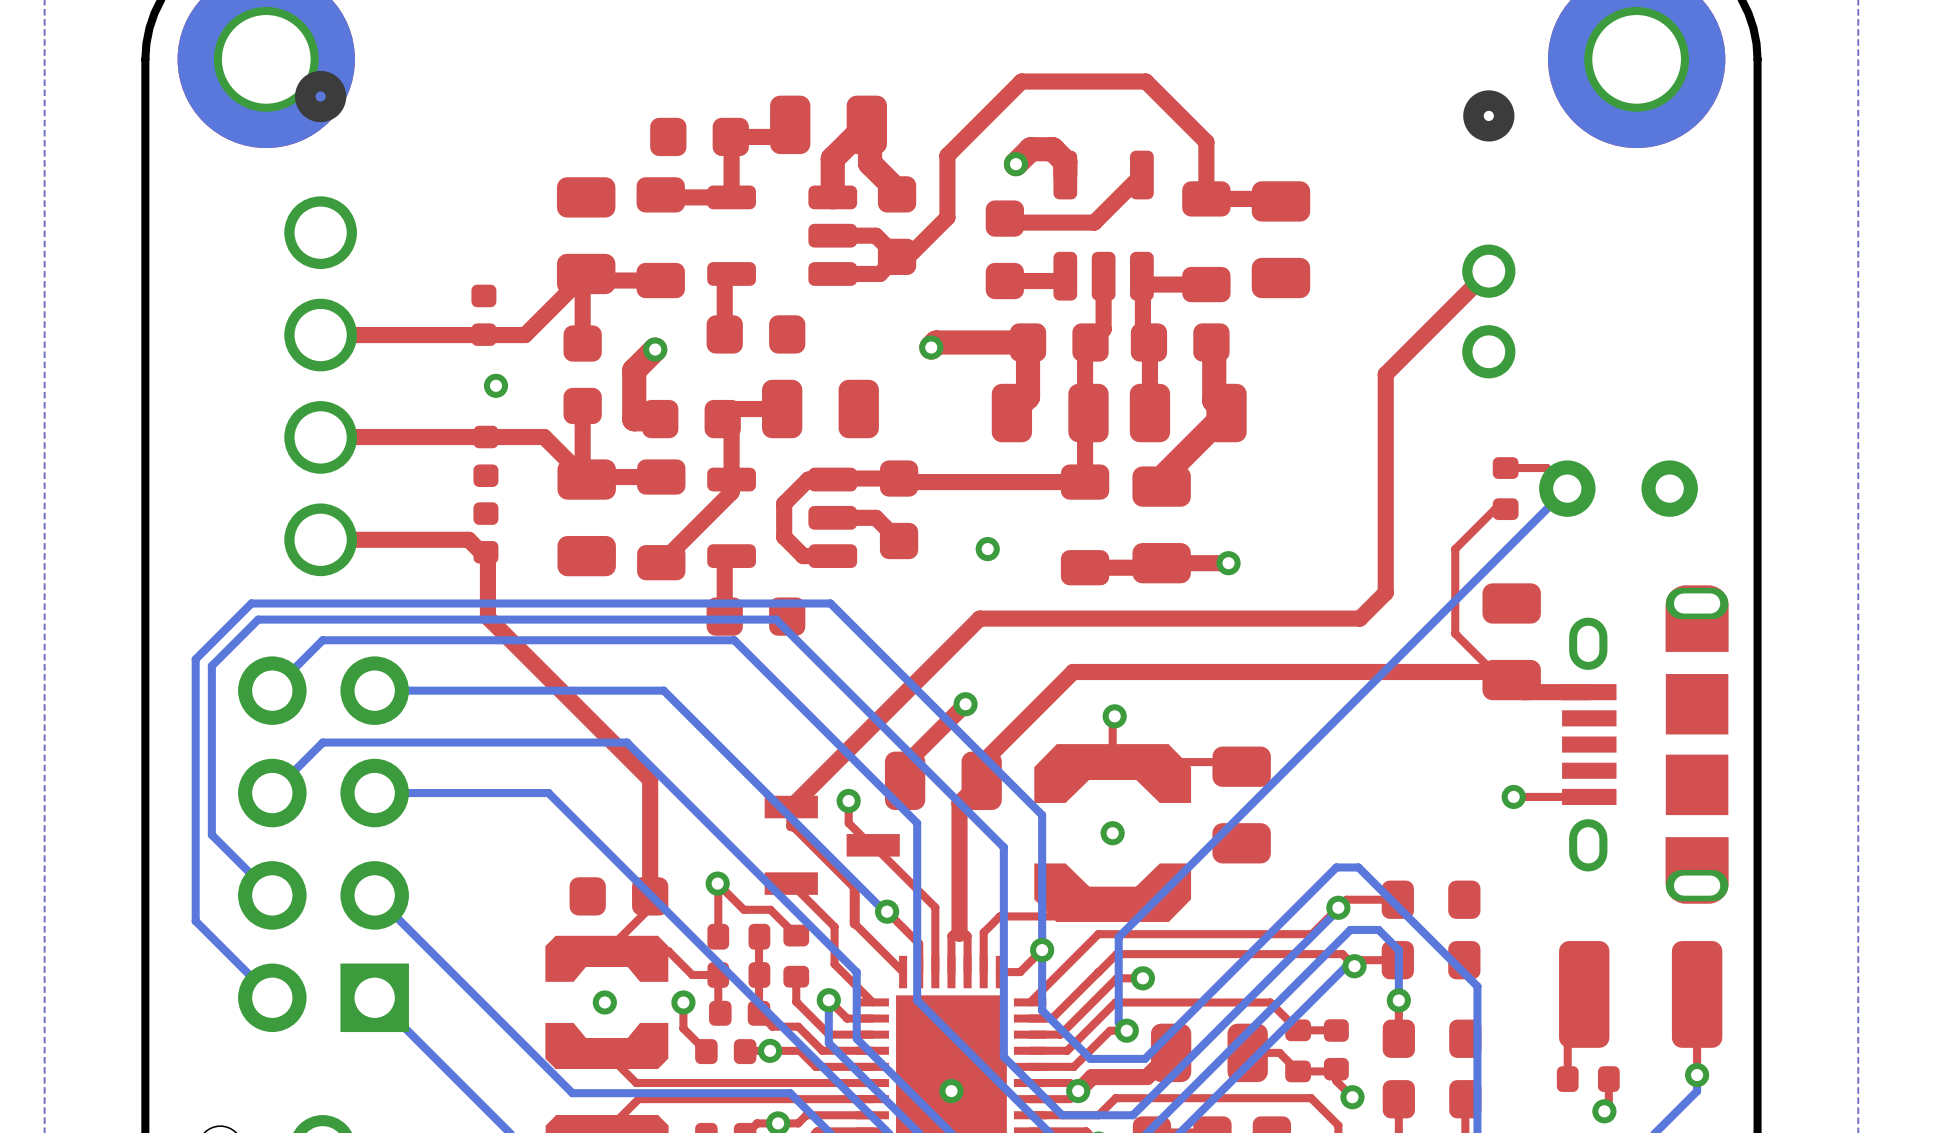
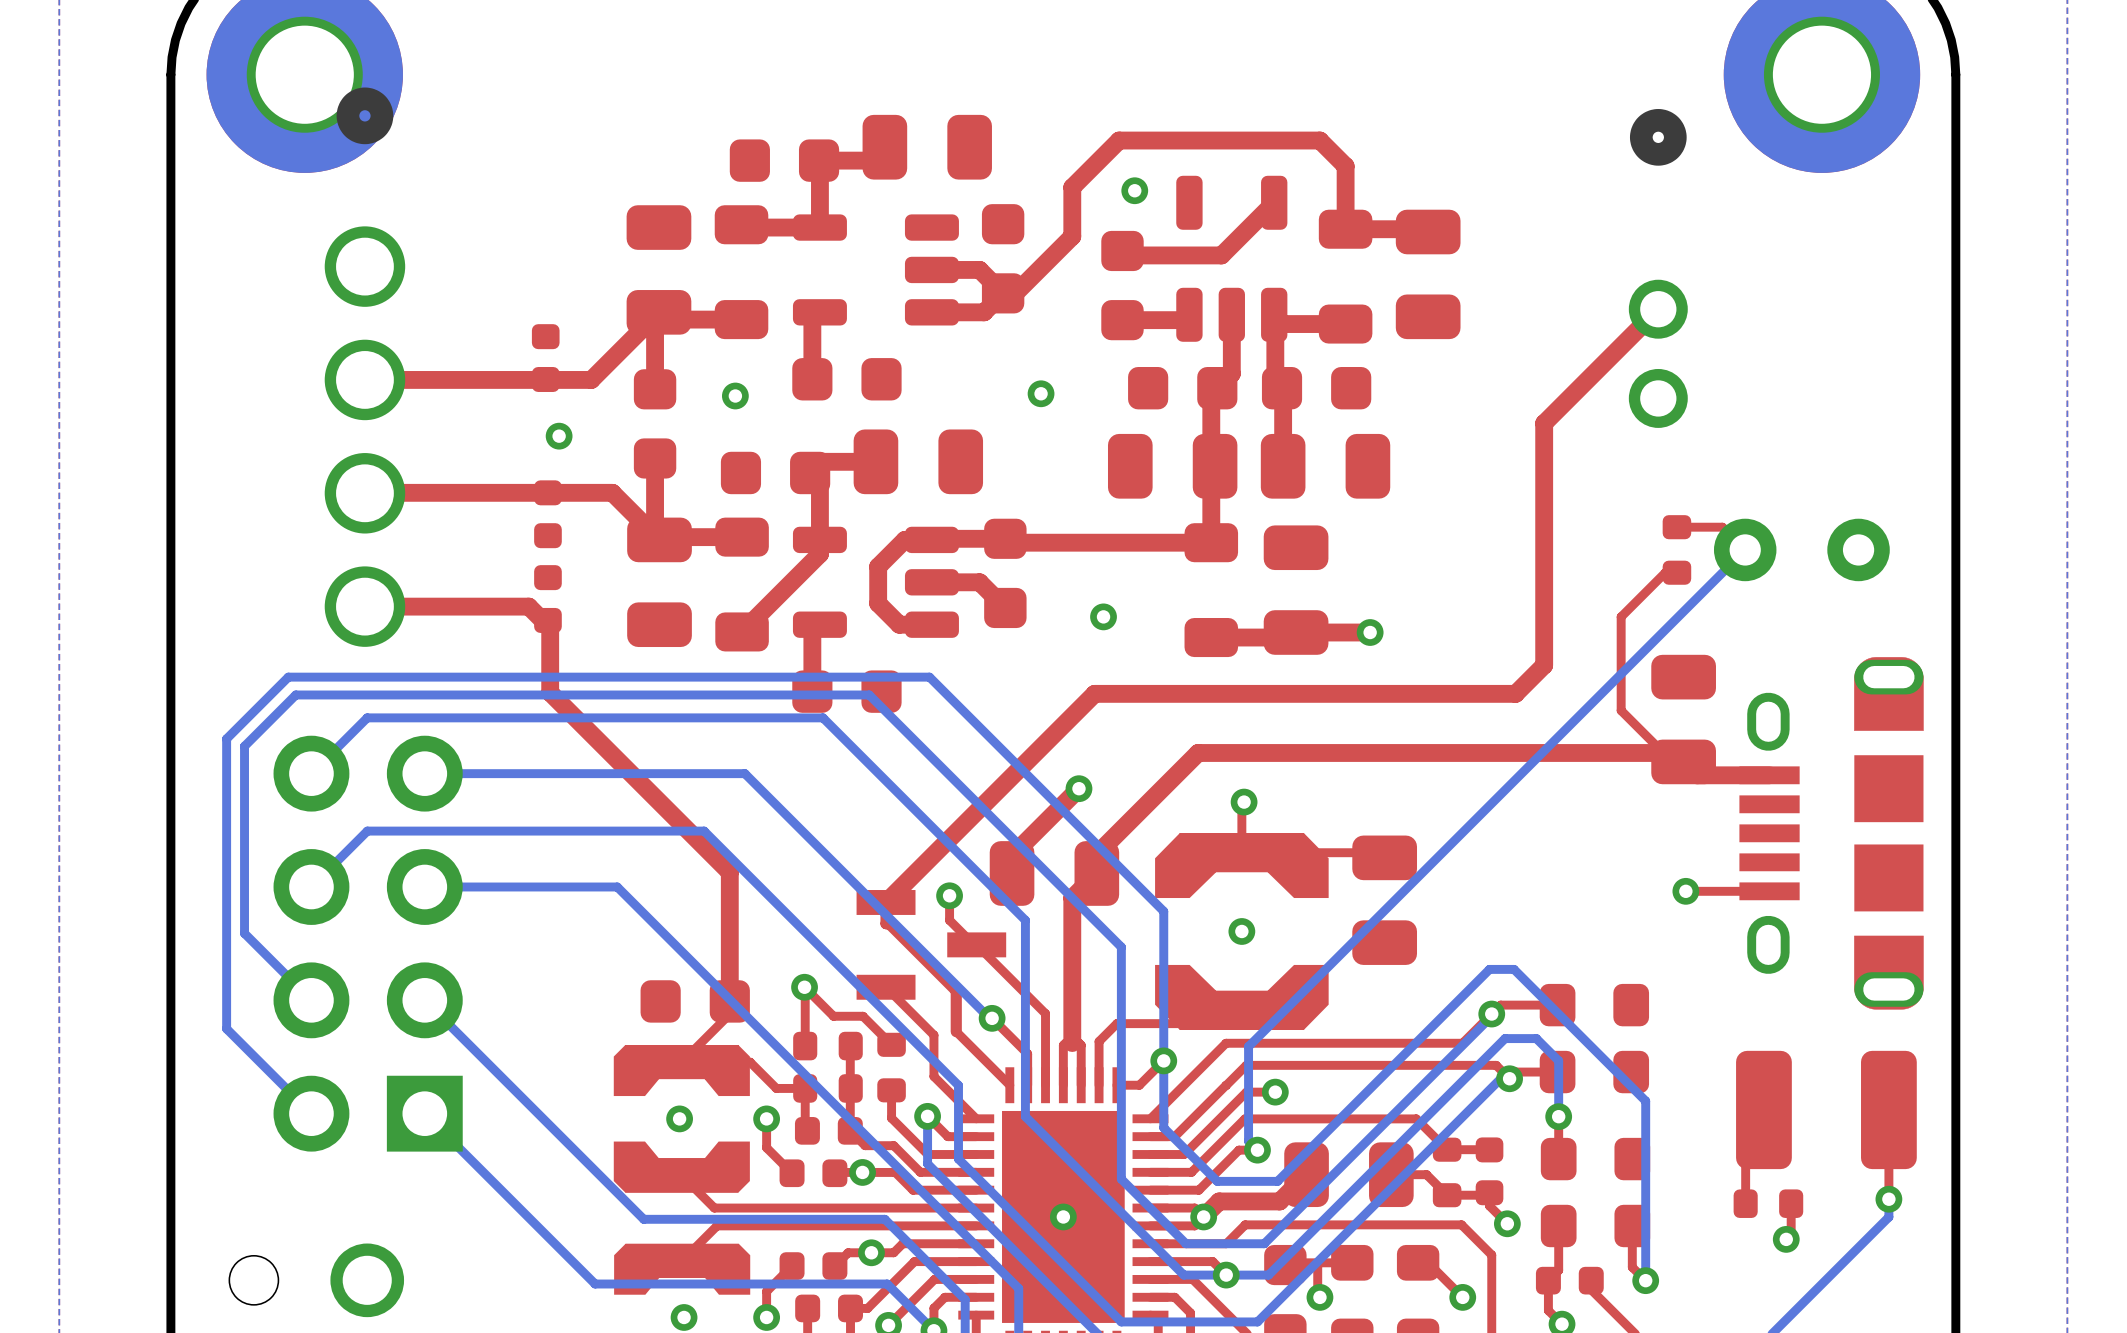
top track: (1183, 118) (1145, 81) (1021, 81) (947, 155) (947, 217) -> (1319, 140) (1119, 140) (1072, 187) (1072, 236) (1058, 249)
top track: (1015, 164) (1030, 149) (1052, 149) (1065, 161) (1065, 175) -> none
top track: (897, 194) (897, 190) (870, 163) (870, 128) (866, 124) (832, 158) (832, 197) -> none
top track: (1211, 342) (1214, 345) (1214, 400) (1226, 413) (1161, 477) (1161, 486) -> none
top track: (931, 347) (936, 342) (1028, 342) (1028, 396) (1011, 413) -> none
top track: (655, 349) (634, 370) (634, 419) (660, 419) -> none

